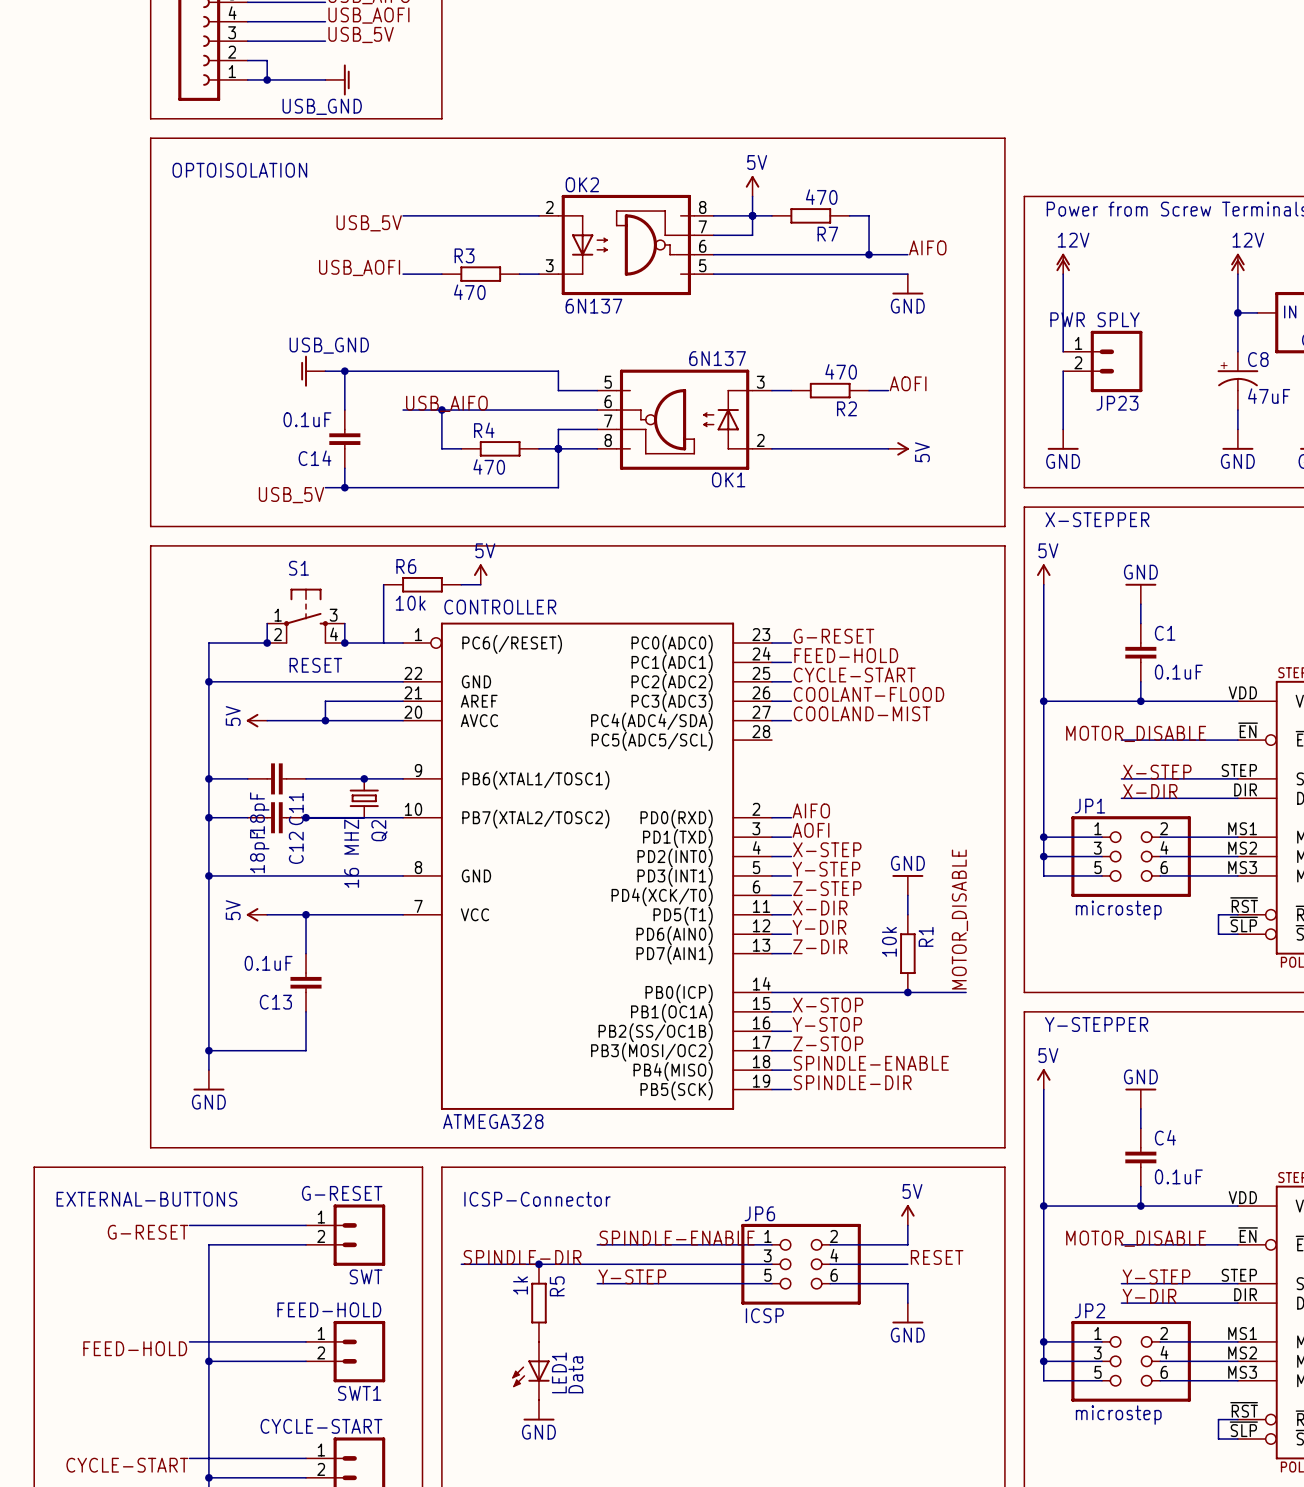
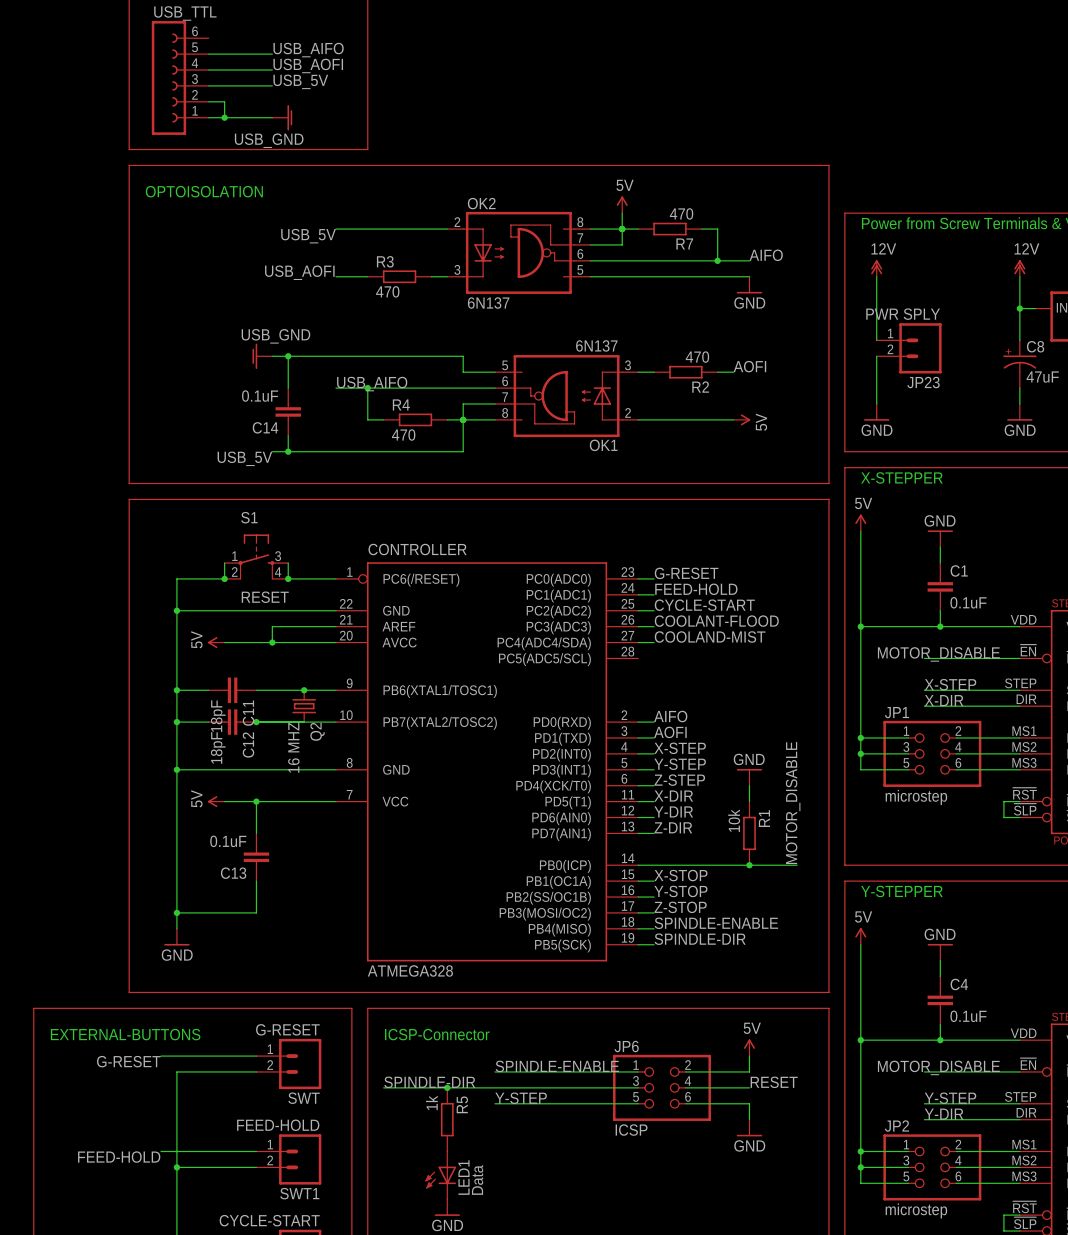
power symbol: 5V (480, 574) -> none
wire: (383, 584) (383, 643) -> none
R6: 10k (422, 584) -> none
wire: (461, 584) (480, 584) -> none

